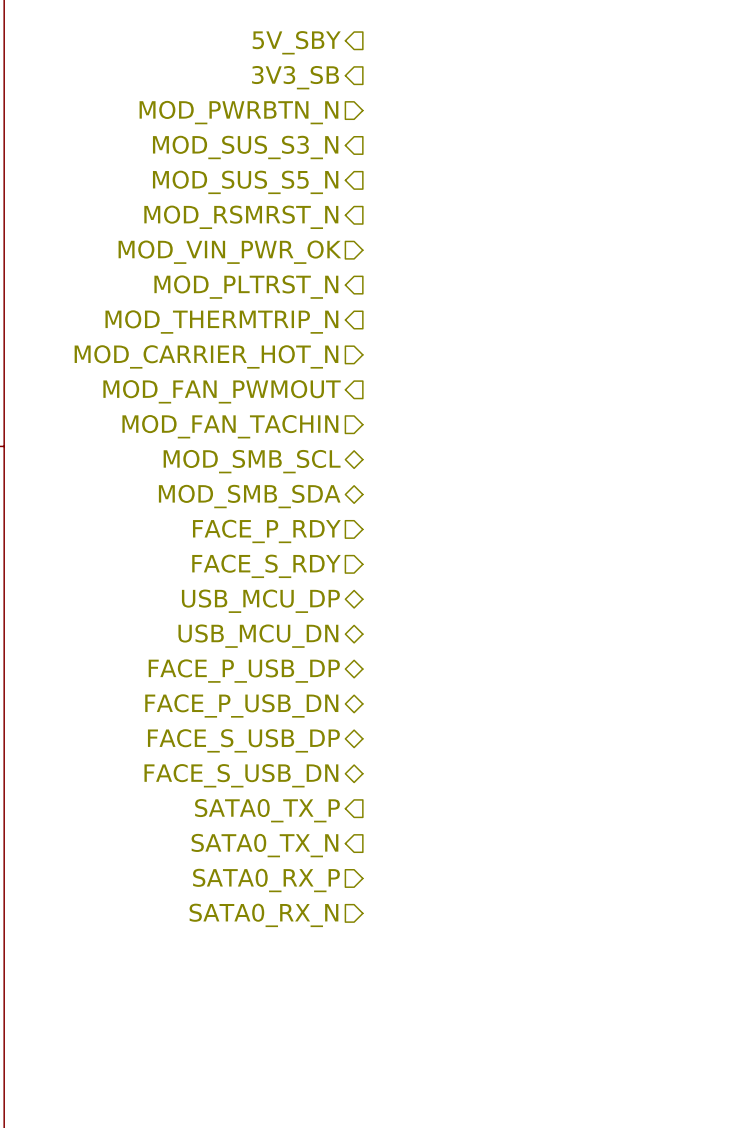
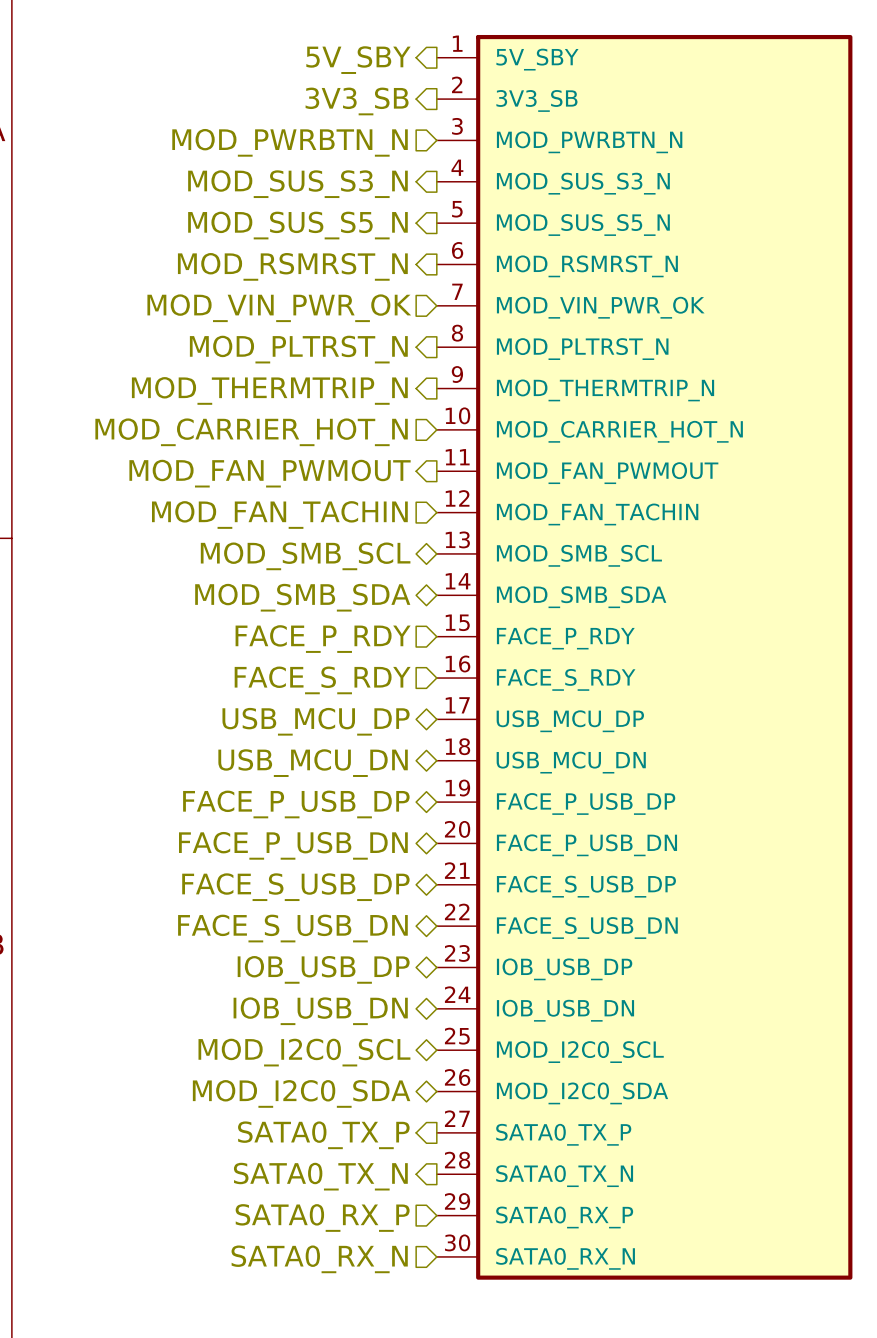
power symbol: none -> (644, 657)
hierarchical label shape: output (267, 810) -> bidirectional (323, 969)
hierarchical label: SATA0_TX_P (267, 810) -> IOB_USB_DP (323, 969)
hierarchical label shape: output (264, 845) -> bidirectional (320, 1011)
hierarchical label: SATA0_TX_N (264, 845) -> IOB_USB_DN (320, 1011)
hierarchical label shape: input (266, 880) -> bidirectional (304, 1052)
hierarchical label: SATA0_RX_P (266, 880) -> MOD_I2C0_SCL (304, 1052)
hierarchical label shape: input (263, 915) -> bidirectional (301, 1093)
hierarchical label: SATA0_RX_N (263, 915) -> MOD_I2C0_SDA (301, 1093)
hierarchical label: none -> SATA0_TX_P (323, 1135)
hierarchical label: none -> SATA0_TX_N (320, 1176)
hierarchical label: none -> SATA0_RX_P (322, 1217)
hierarchical label: none -> SATA0_RX_N (319, 1259)

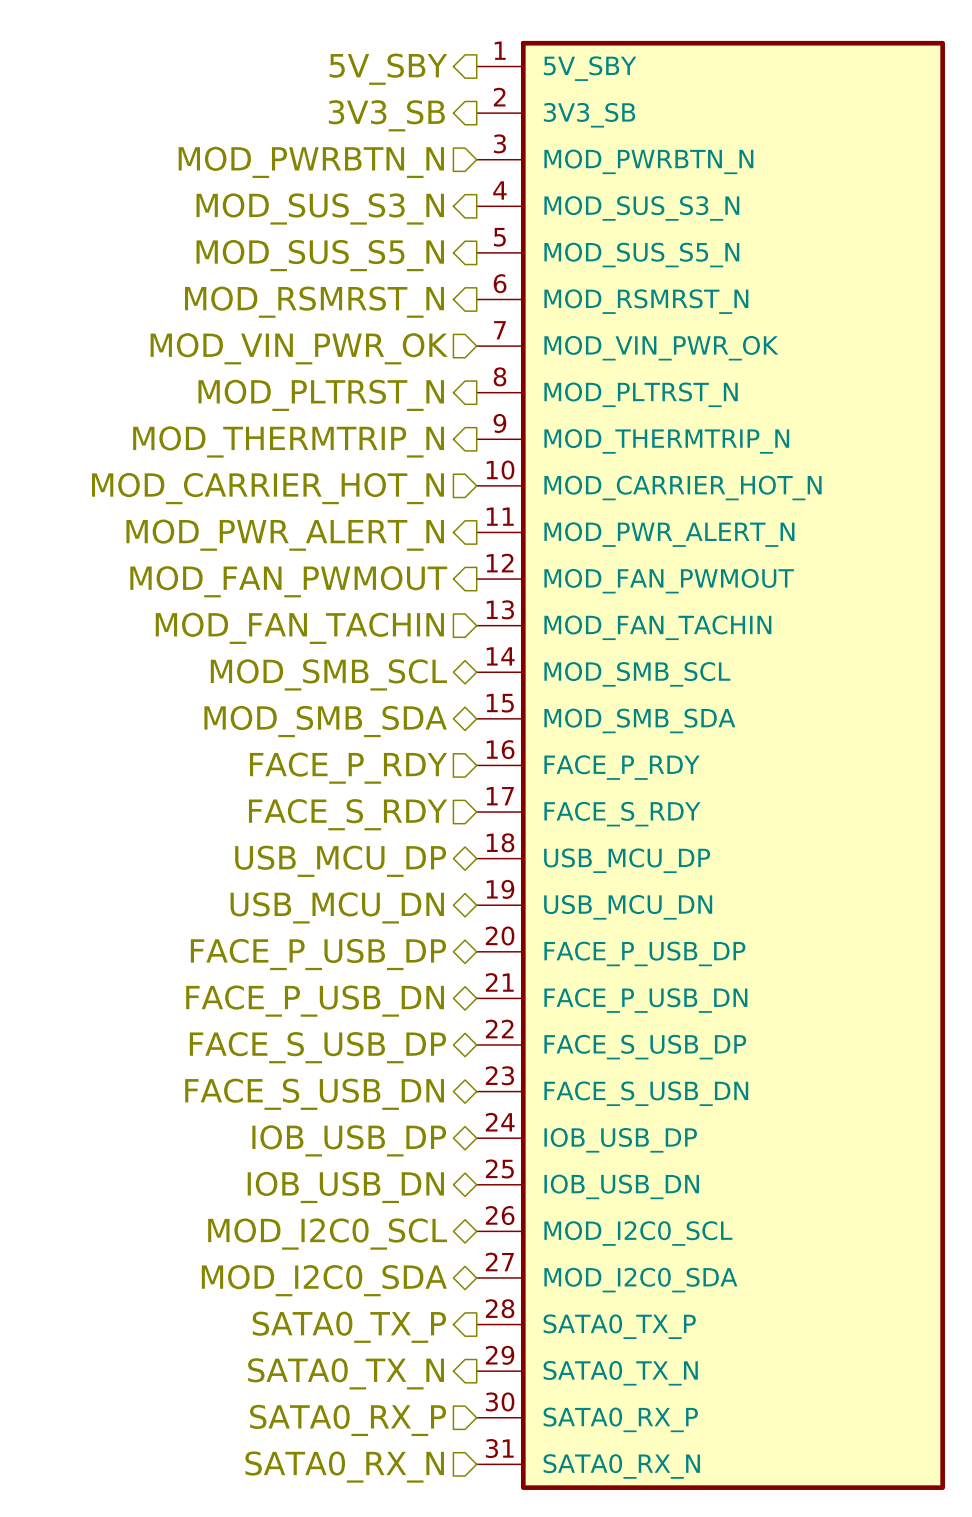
hierarchical label: MOD_FAN_PWMOUT (270, 473) -> MOD_PWR_ALERT_N (285, 535)
hierarchical label shape: input (279, 514) -> output (288, 581)
hierarchical label: MOD_FAN_TACHIN (279, 514) -> MOD_FAN_PWMOUT (288, 581)
hierarchical label shape: bidirectional (305, 556) -> input (299, 628)
hierarchical label: MOD_SMB_SCL (305, 556) -> MOD_FAN_TACHIN (299, 628)
hierarchical label: MOD_SMB_SDA (302, 597) -> MOD_SMB_SCL (328, 674)
hierarchical label shape: input (323, 639) -> bidirectional (325, 721)
hierarchical label: FACE_P_RDY (323, 639) -> MOD_SMB_SDA (325, 721)
power symbol: (644, 657) -> none
power symbol: none -> (710, 765)
hierarchical label: FACE_S_RDY (322, 680) -> FACE_P_RDY (348, 768)
hierarchical label shape: bidirectional (316, 721) -> input (348, 814)
hierarchical label: USB_MCU_DP (316, 721) -> FACE_S_RDY (348, 814)
hierarchical label: USB_MCU_DN (313, 763) -> USB_MCU_DP (340, 861)
hierarchical label: FACE_P_USB_DP (296, 804) -> USB_MCU_DN (337, 907)
hierarchical label: FACE_P_USB_DN (293, 845) -> FACE_P_USB_DP (318, 954)
hierarchical label: FACE_S_USB_DP (295, 887) -> FACE_P_USB_DN (315, 1001)
hierarchical label: FACE_S_USB_DN (292, 928) -> FACE_S_USB_DP (317, 1047)
hierarchical label: IOB_USB_DP (323, 969) -> FACE_S_USB_DN (314, 1094)
hierarchical label: IOB_USB_DN (320, 1011) -> IOB_USB_DP (349, 1140)
hierarchical label: MOD_I2C0_SCL (304, 1052) -> IOB_USB_DN (345, 1187)
hierarchical label: MOD_I2C0_SDA (301, 1093) -> MOD_I2C0_SCL (327, 1234)
hierarchical label shape: output (323, 1135) -> bidirectional (324, 1280)
hierarchical label: SATA0_TX_P (323, 1135) -> MOD_I2C0_SDA (324, 1280)
hierarchical label: SATA0_TX_N (320, 1176) -> SATA0_TX_P (349, 1327)
hierarchical label shape: input (322, 1217) -> output (346, 1373)
hierarchical label: SATA0_RX_P (322, 1217) -> SATA0_TX_N (346, 1373)
hierarchical label: SATA0_RX_N (319, 1259) -> SATA0_RX_P (348, 1420)
hierarchical label: none -> SATA0_RX_N (344, 1467)

